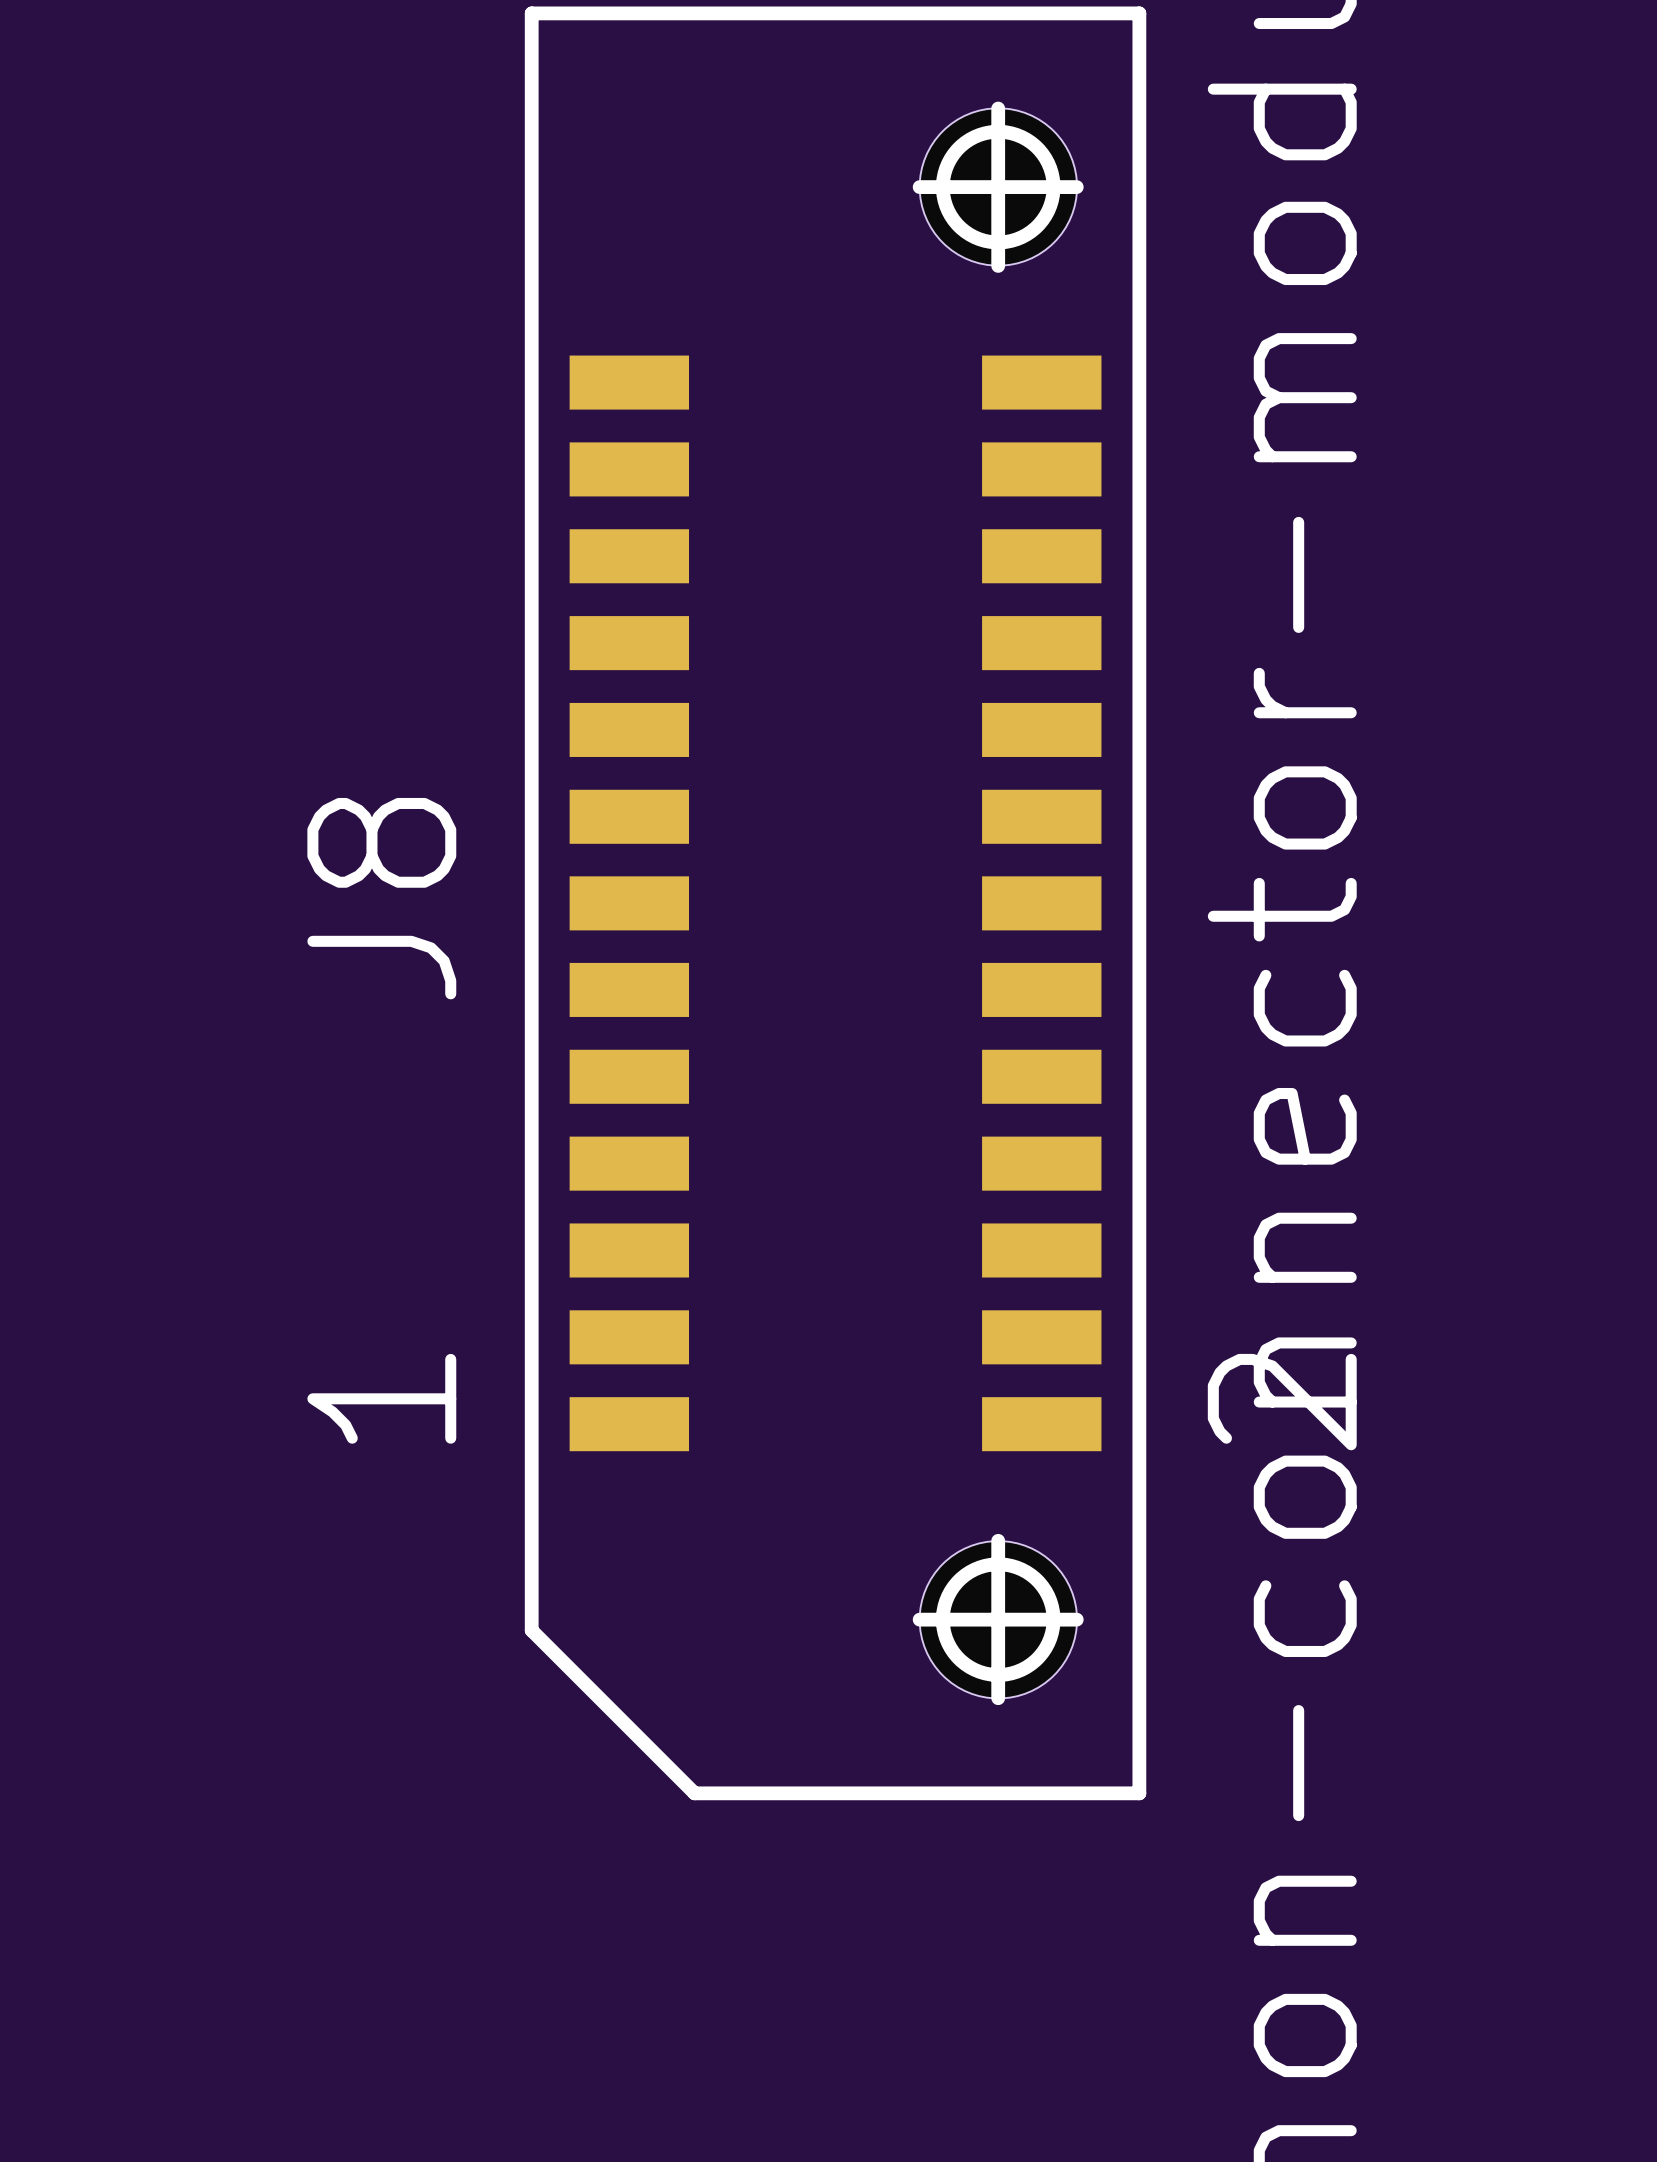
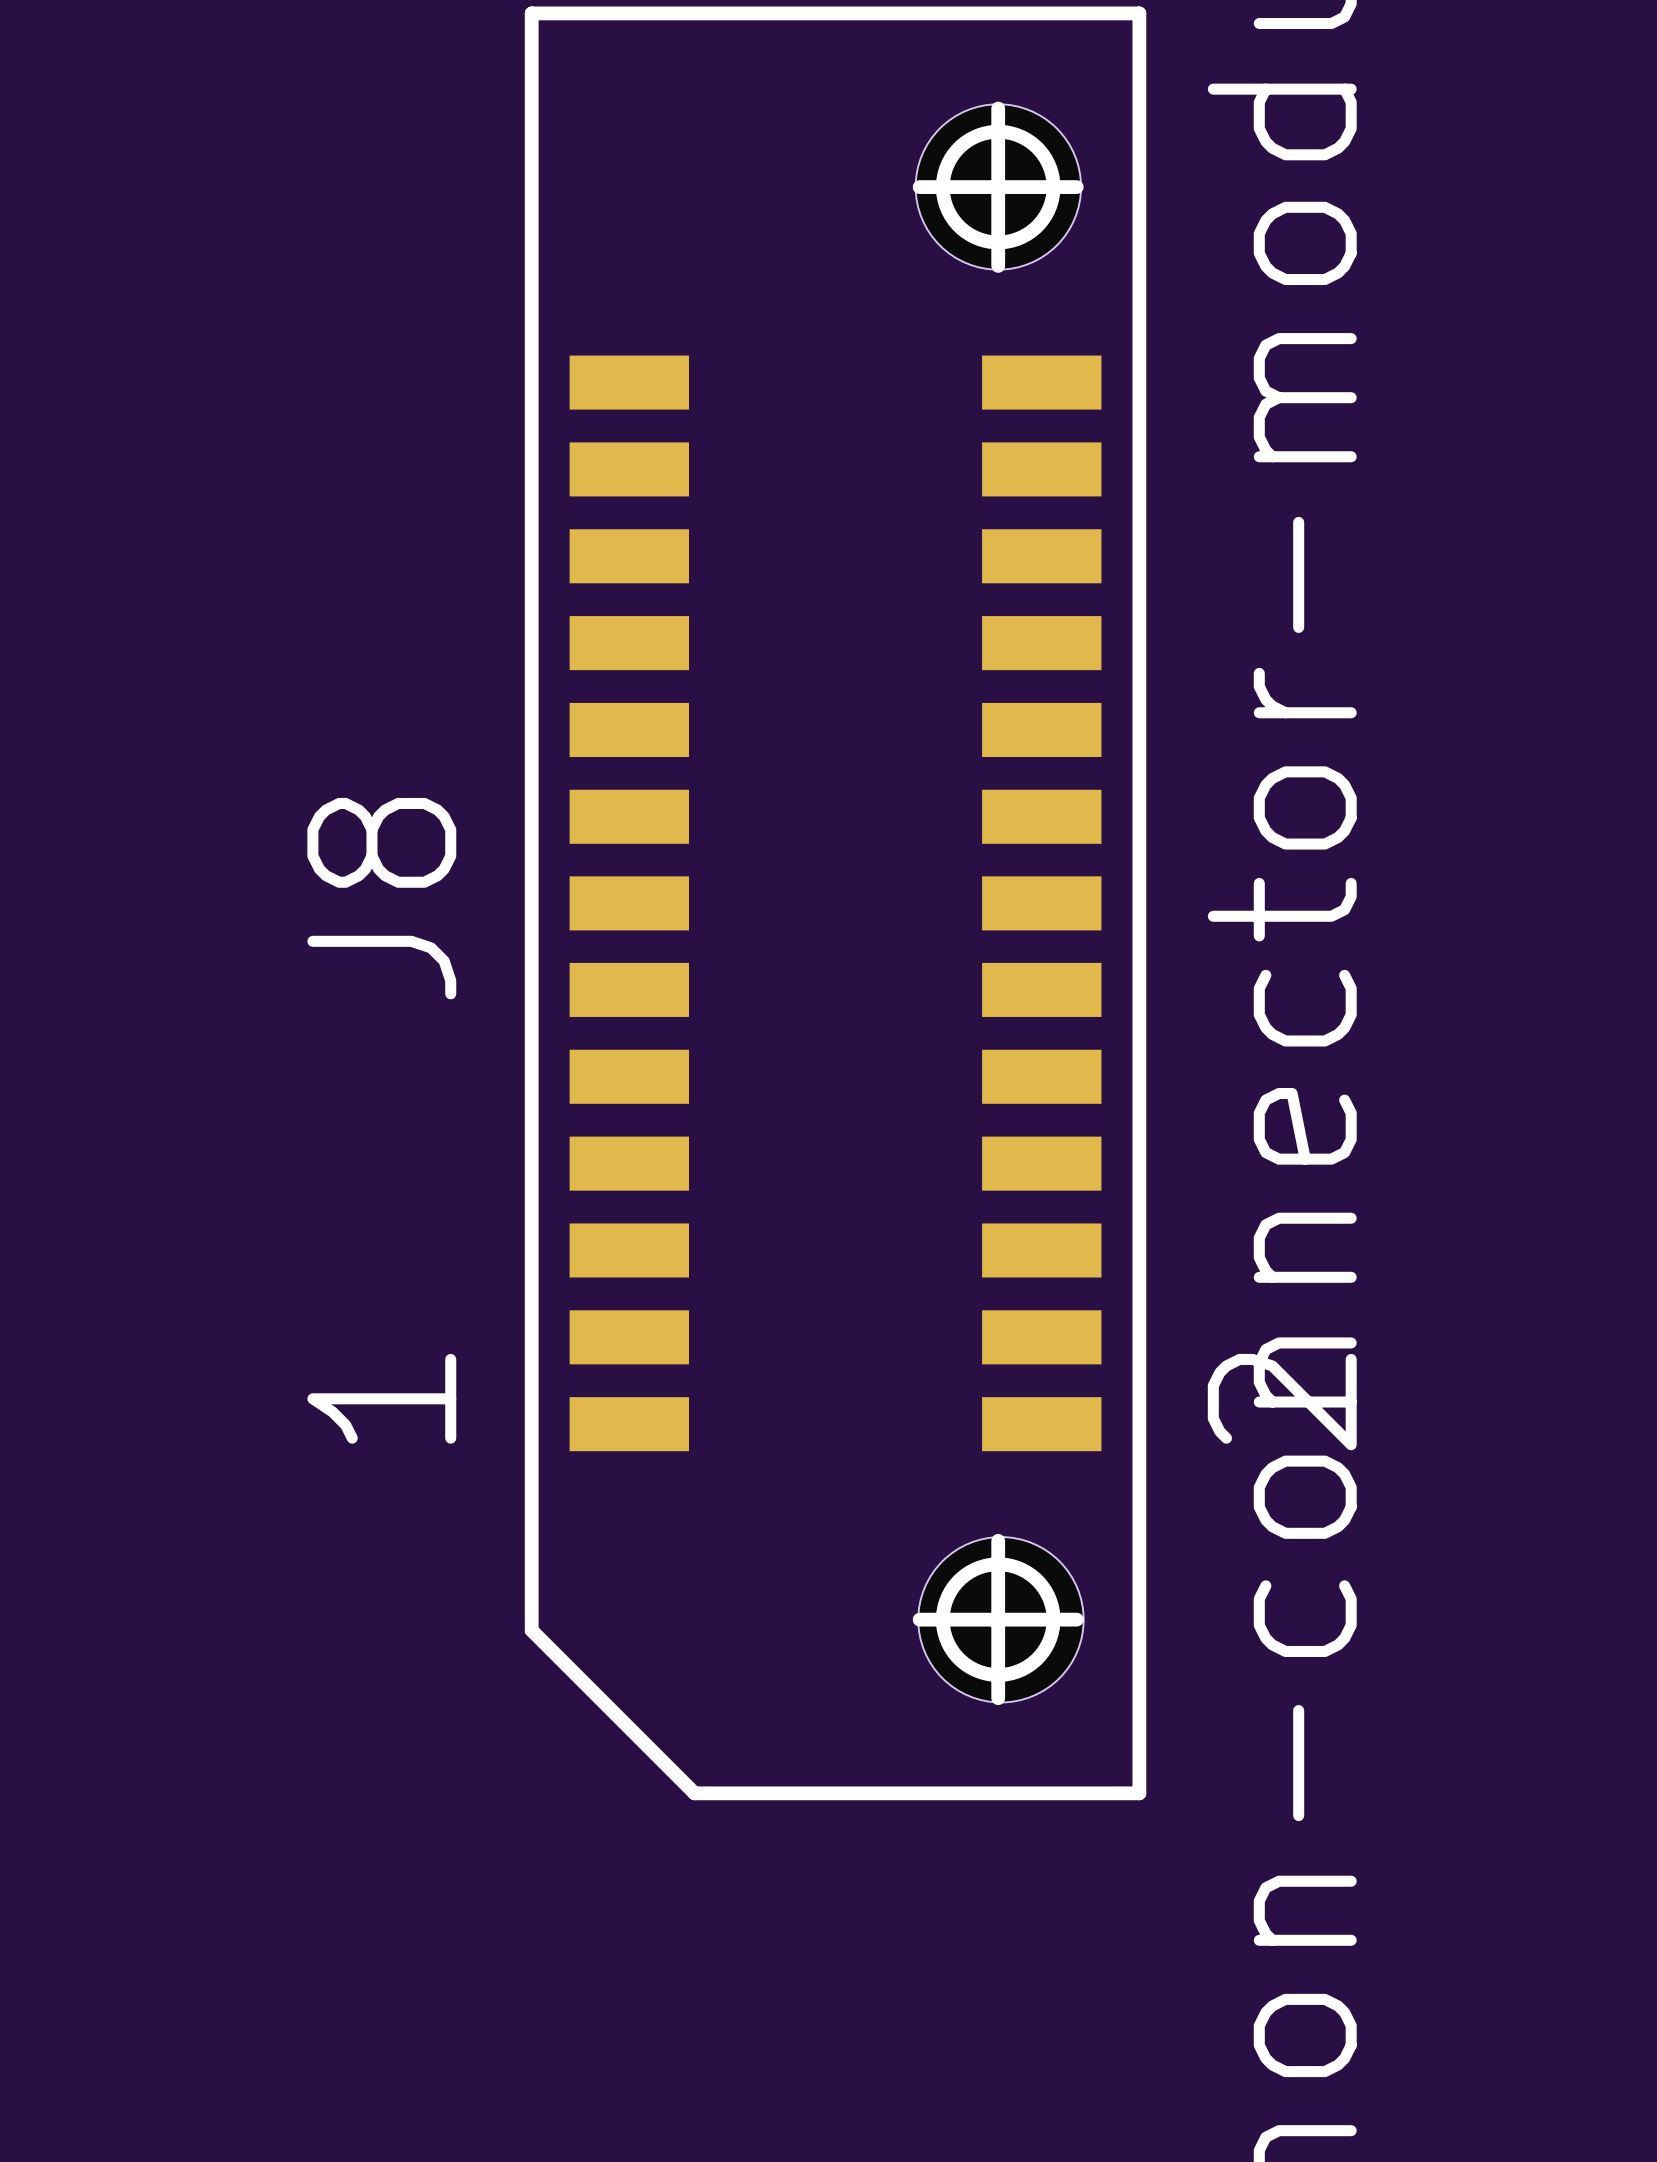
J8 footprint: [524, 6, 1147, 1801] -> [524, 6, 1147, 1801]

